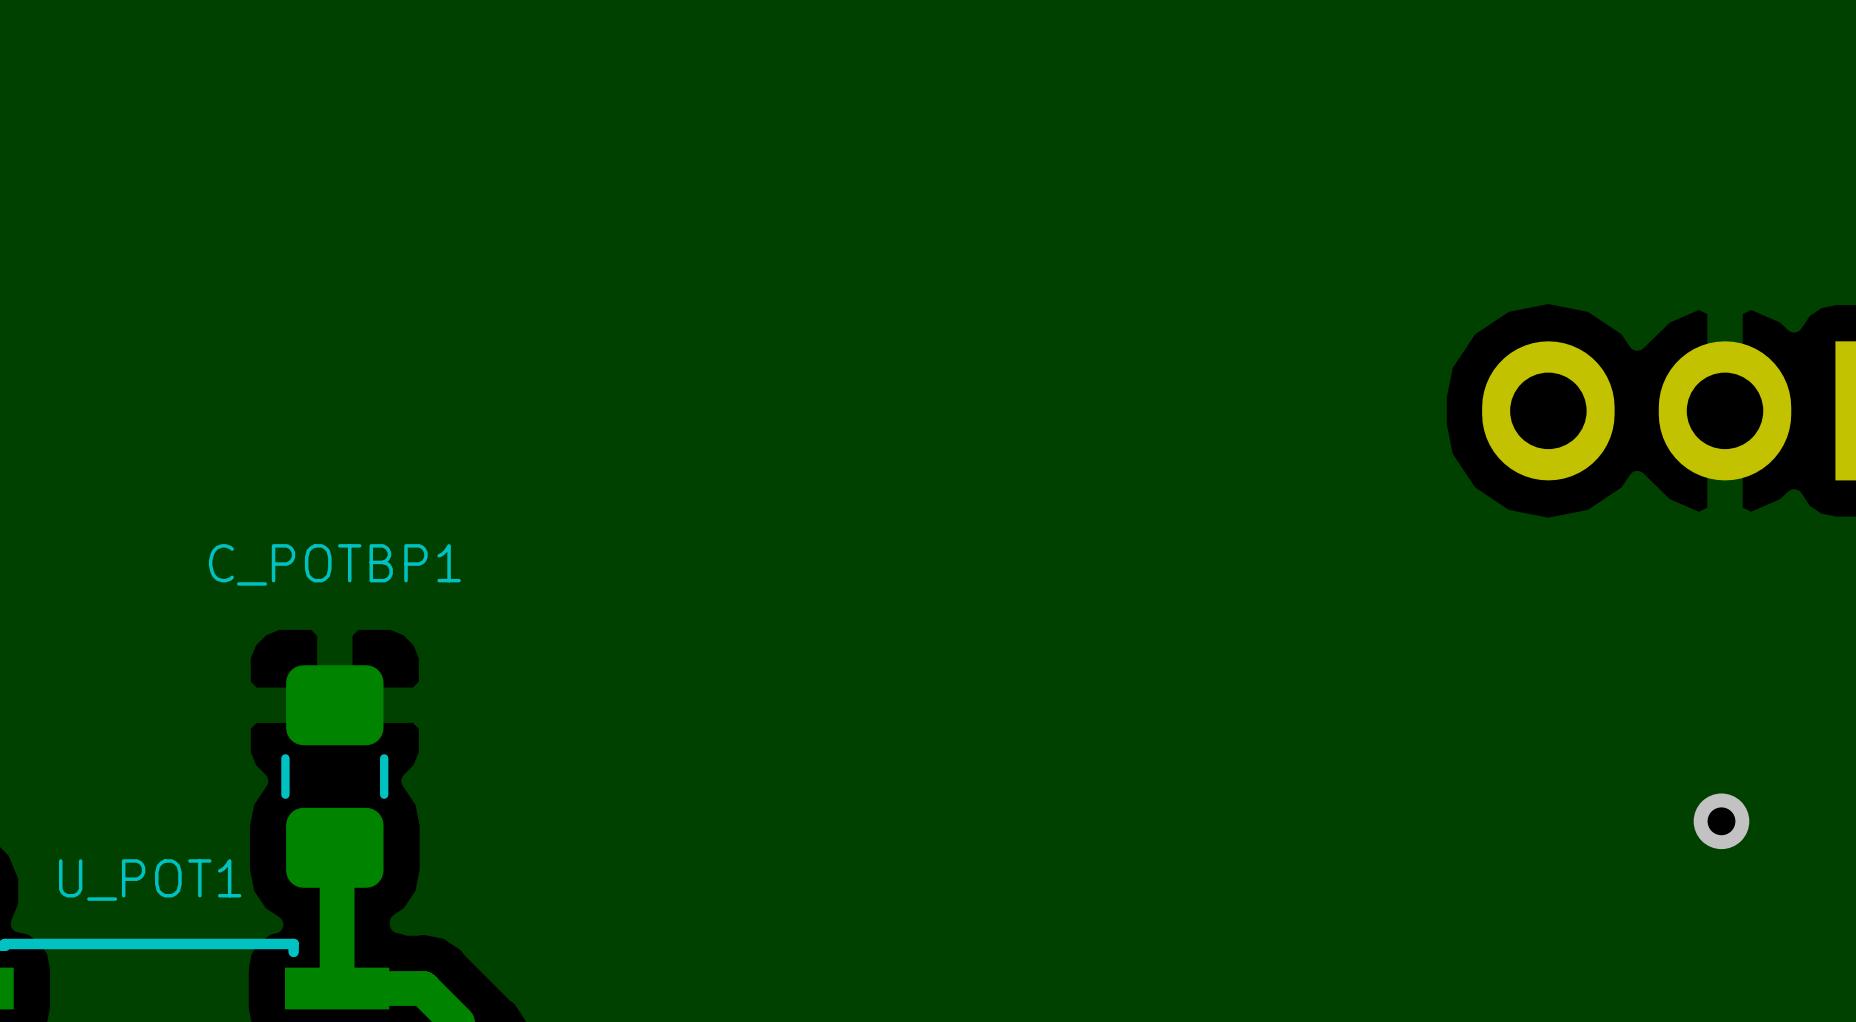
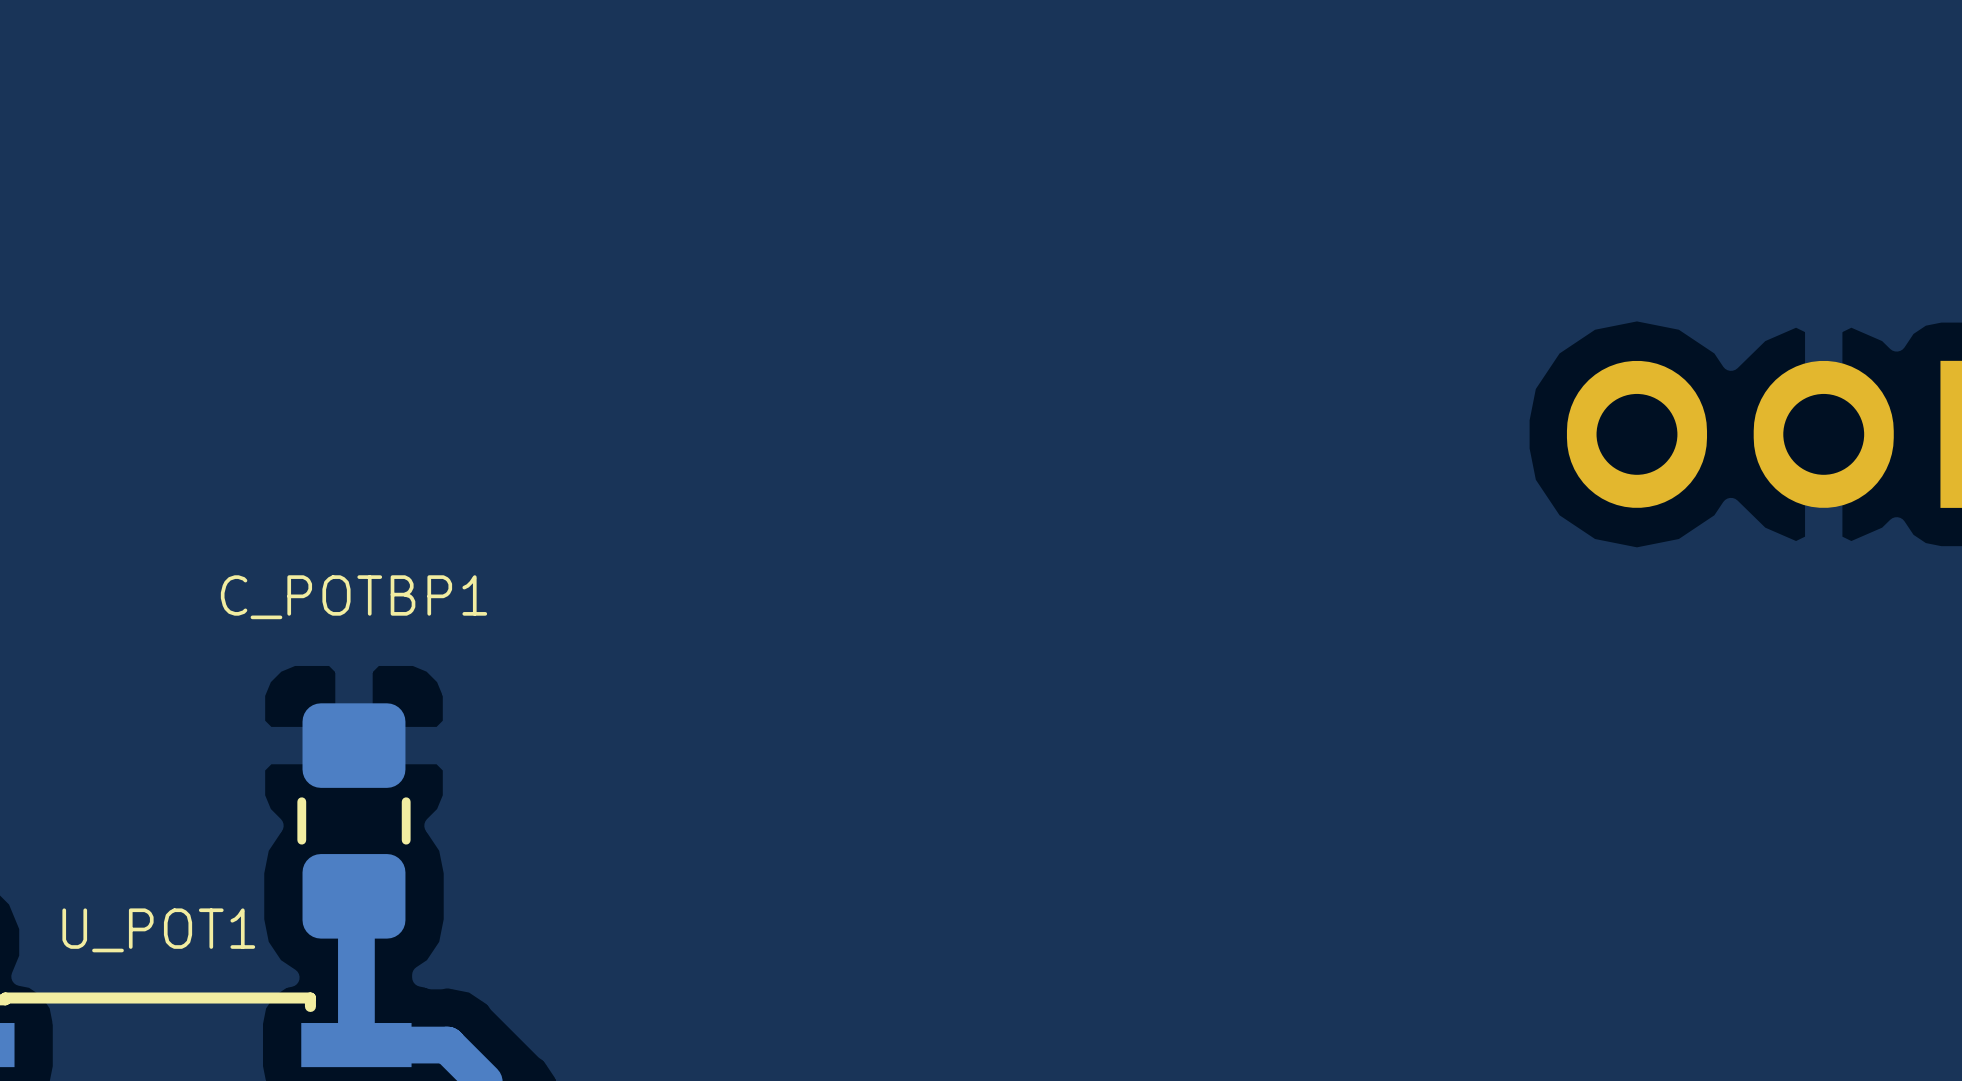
via: (1721, 821) -> none

